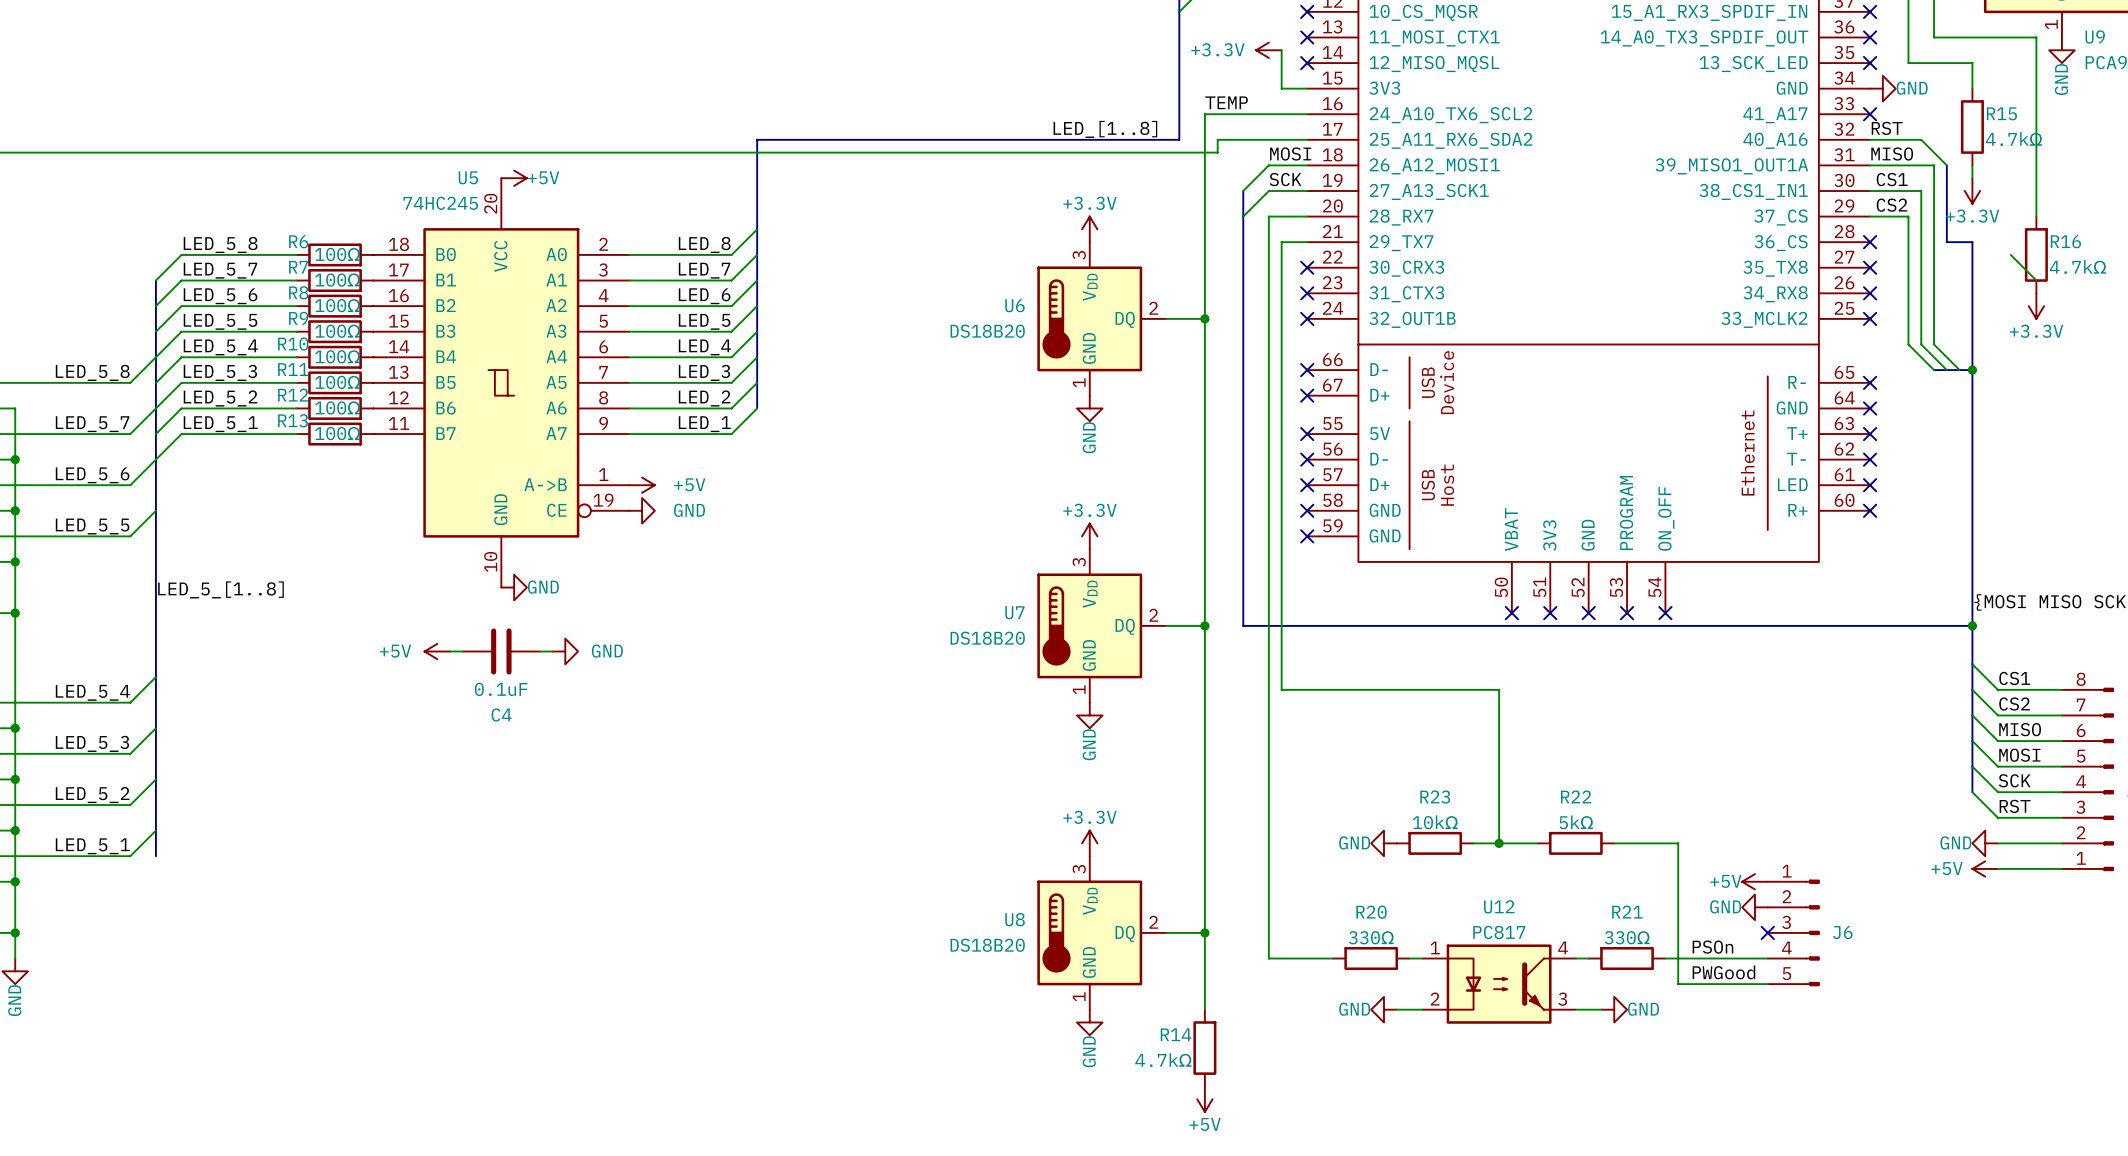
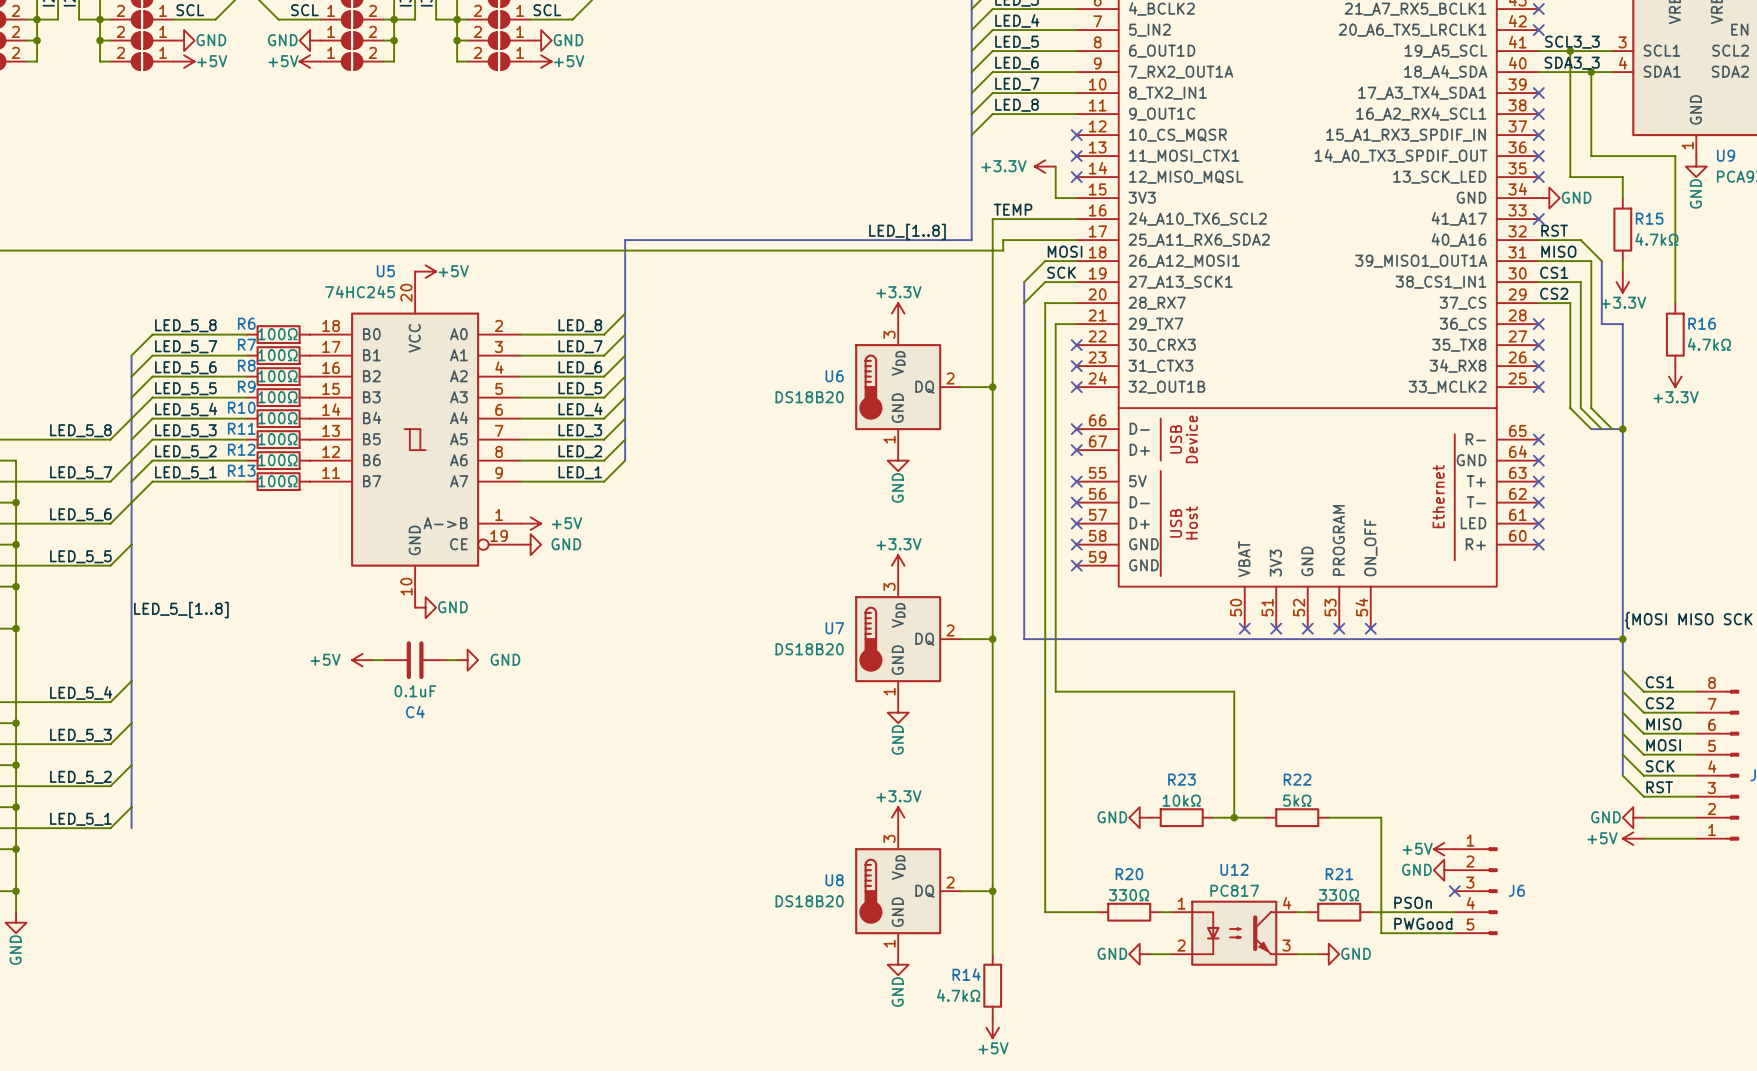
wire: (2010, 254) (2036, 280) -> none

